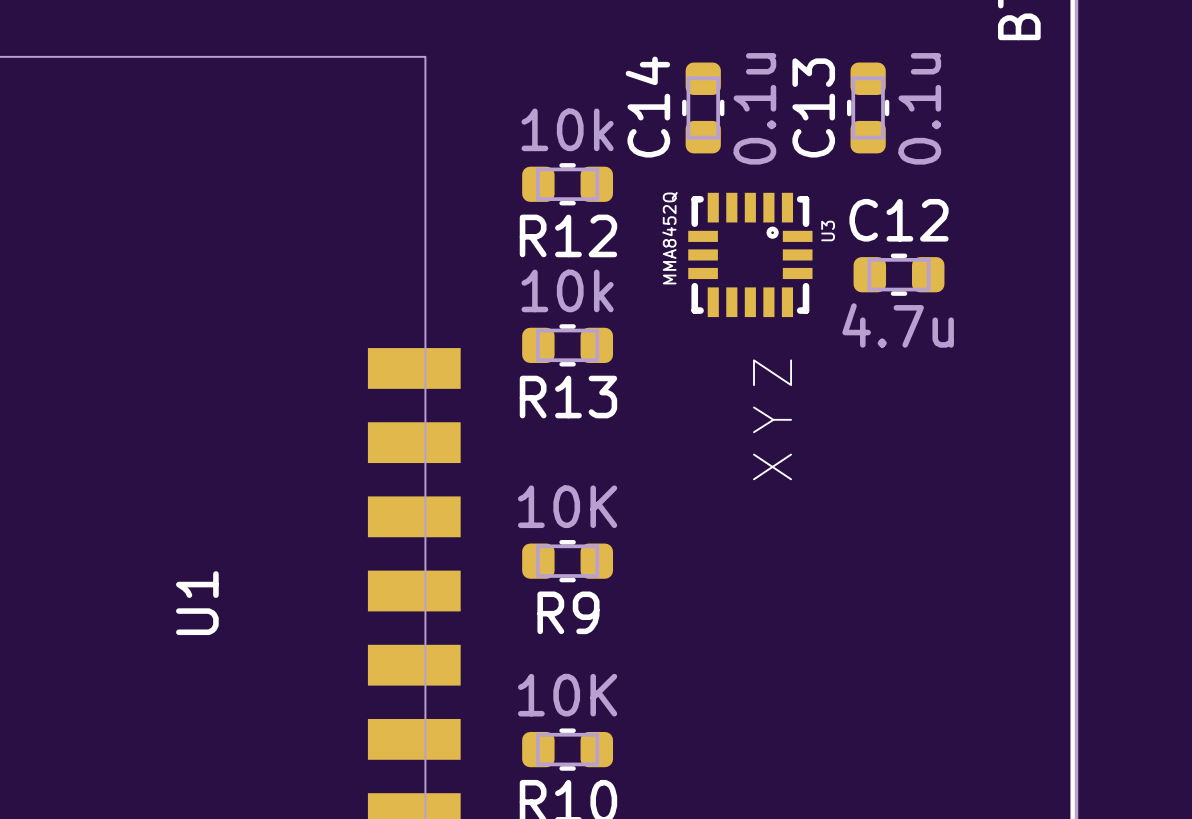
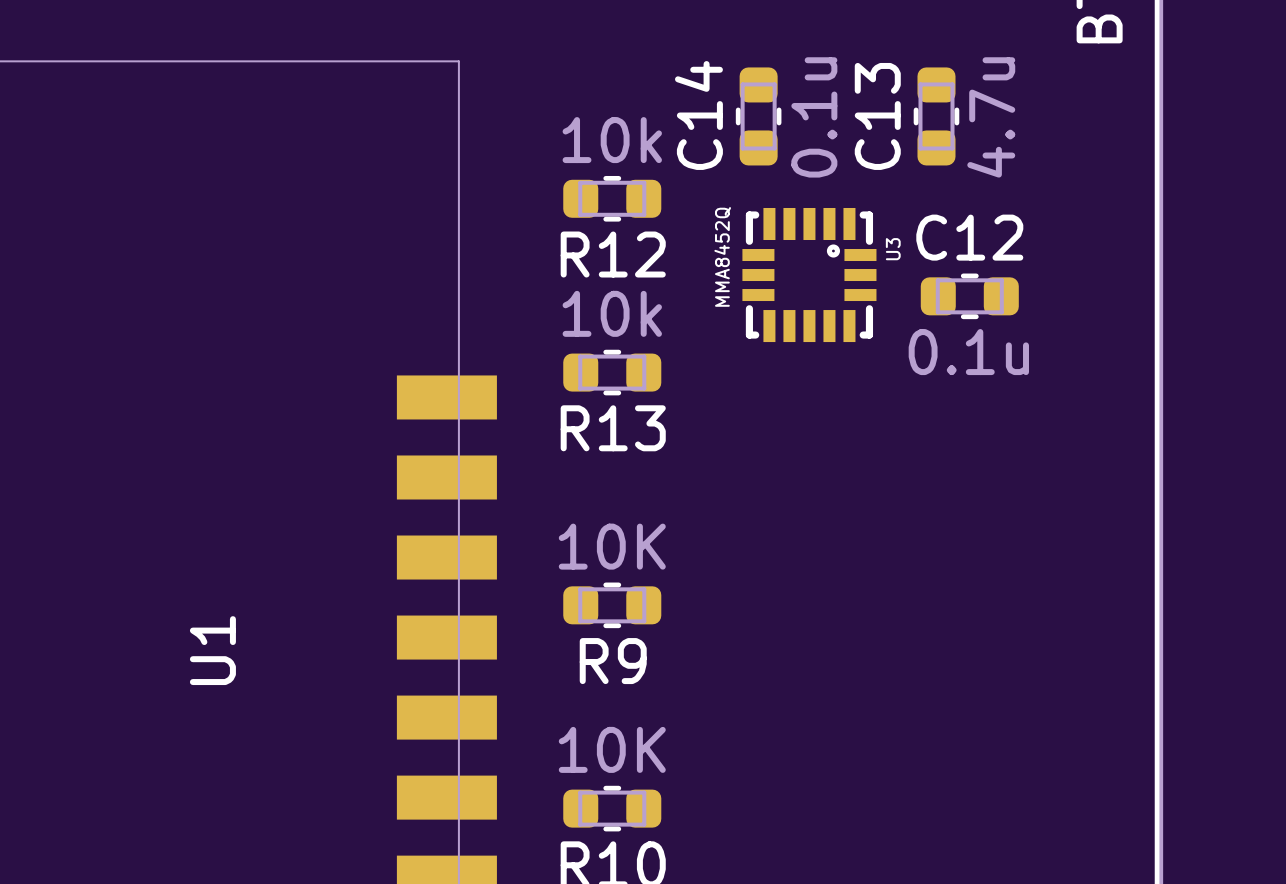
C13 value: 0.1u (919, 108) -> 4.7u (991, 117)
C12 value: 4.7u (898, 325) -> 0.1u (968, 352)
U3 text: Z (772, 372) -> none
U3 text: Y (772, 419) -> none
U3 text: X (772, 466) -> none

